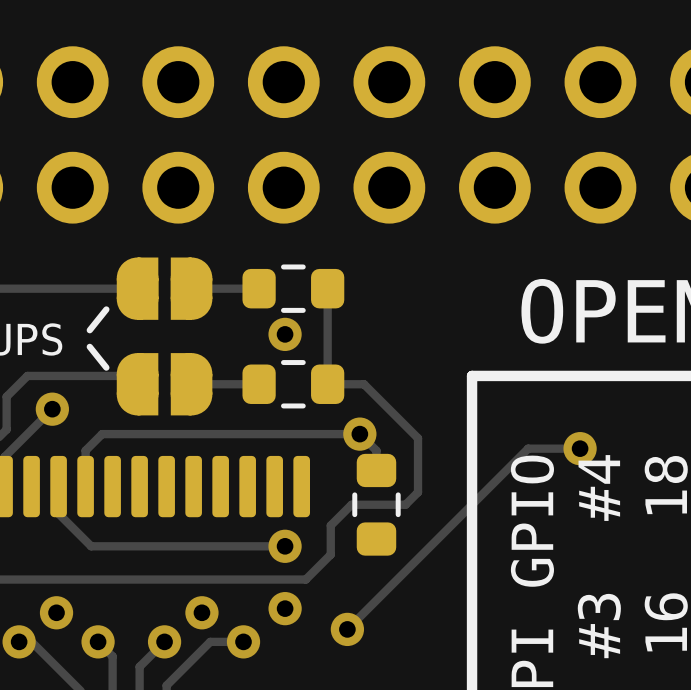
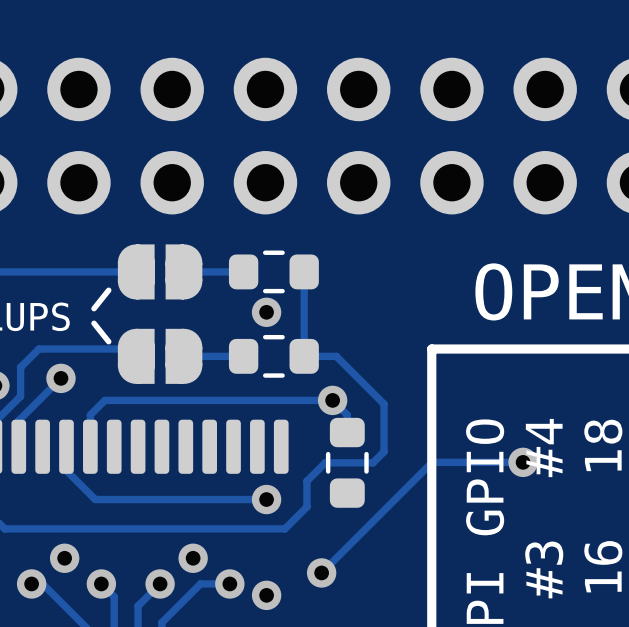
track: (580, 448) (528, 448) (472, 504) -> (523, 462) (432, 462)
via position: (580, 448) -> (523, 462)
via position: (285, 608) -> (266, 595)

